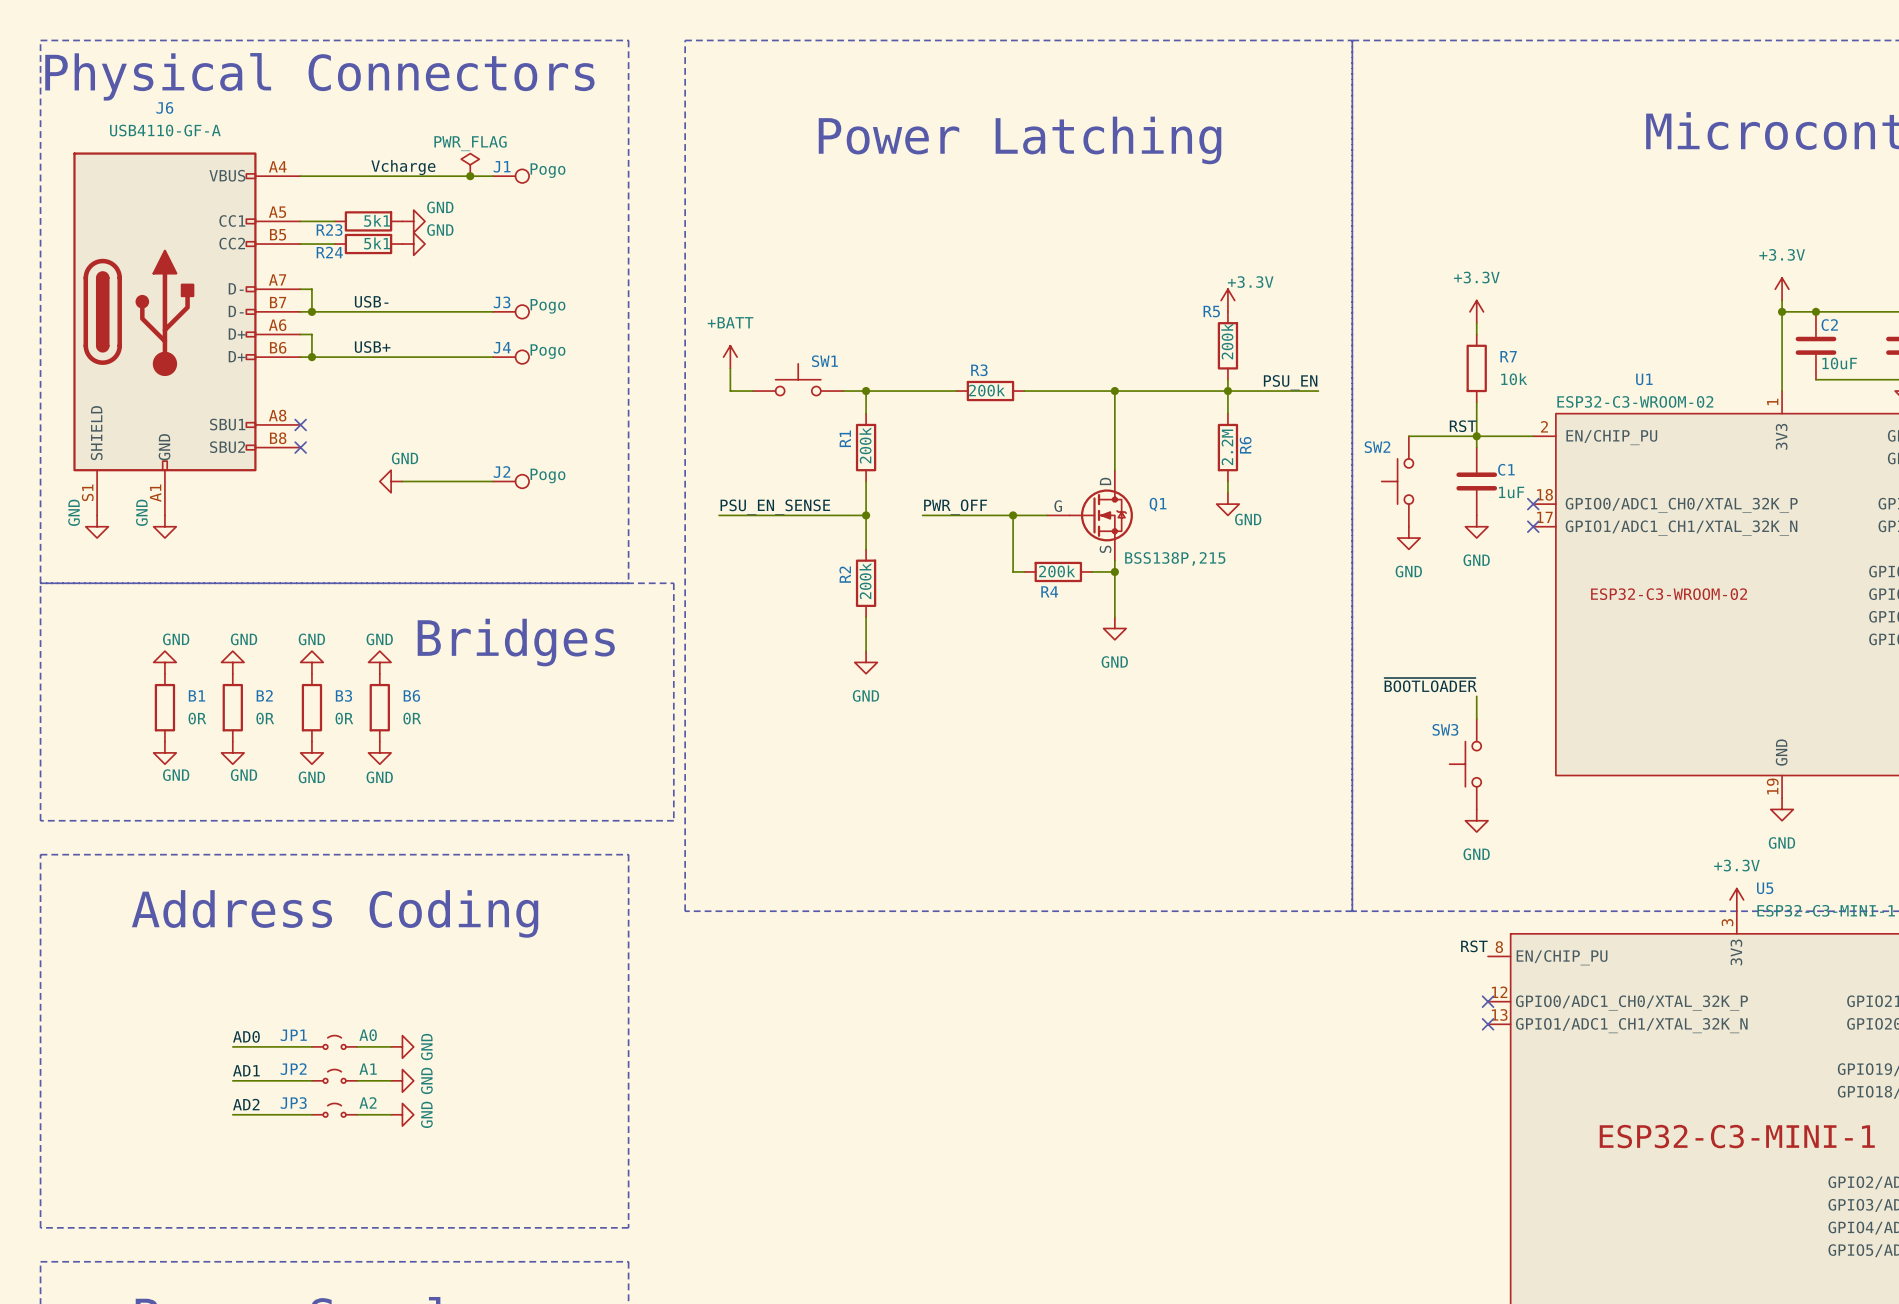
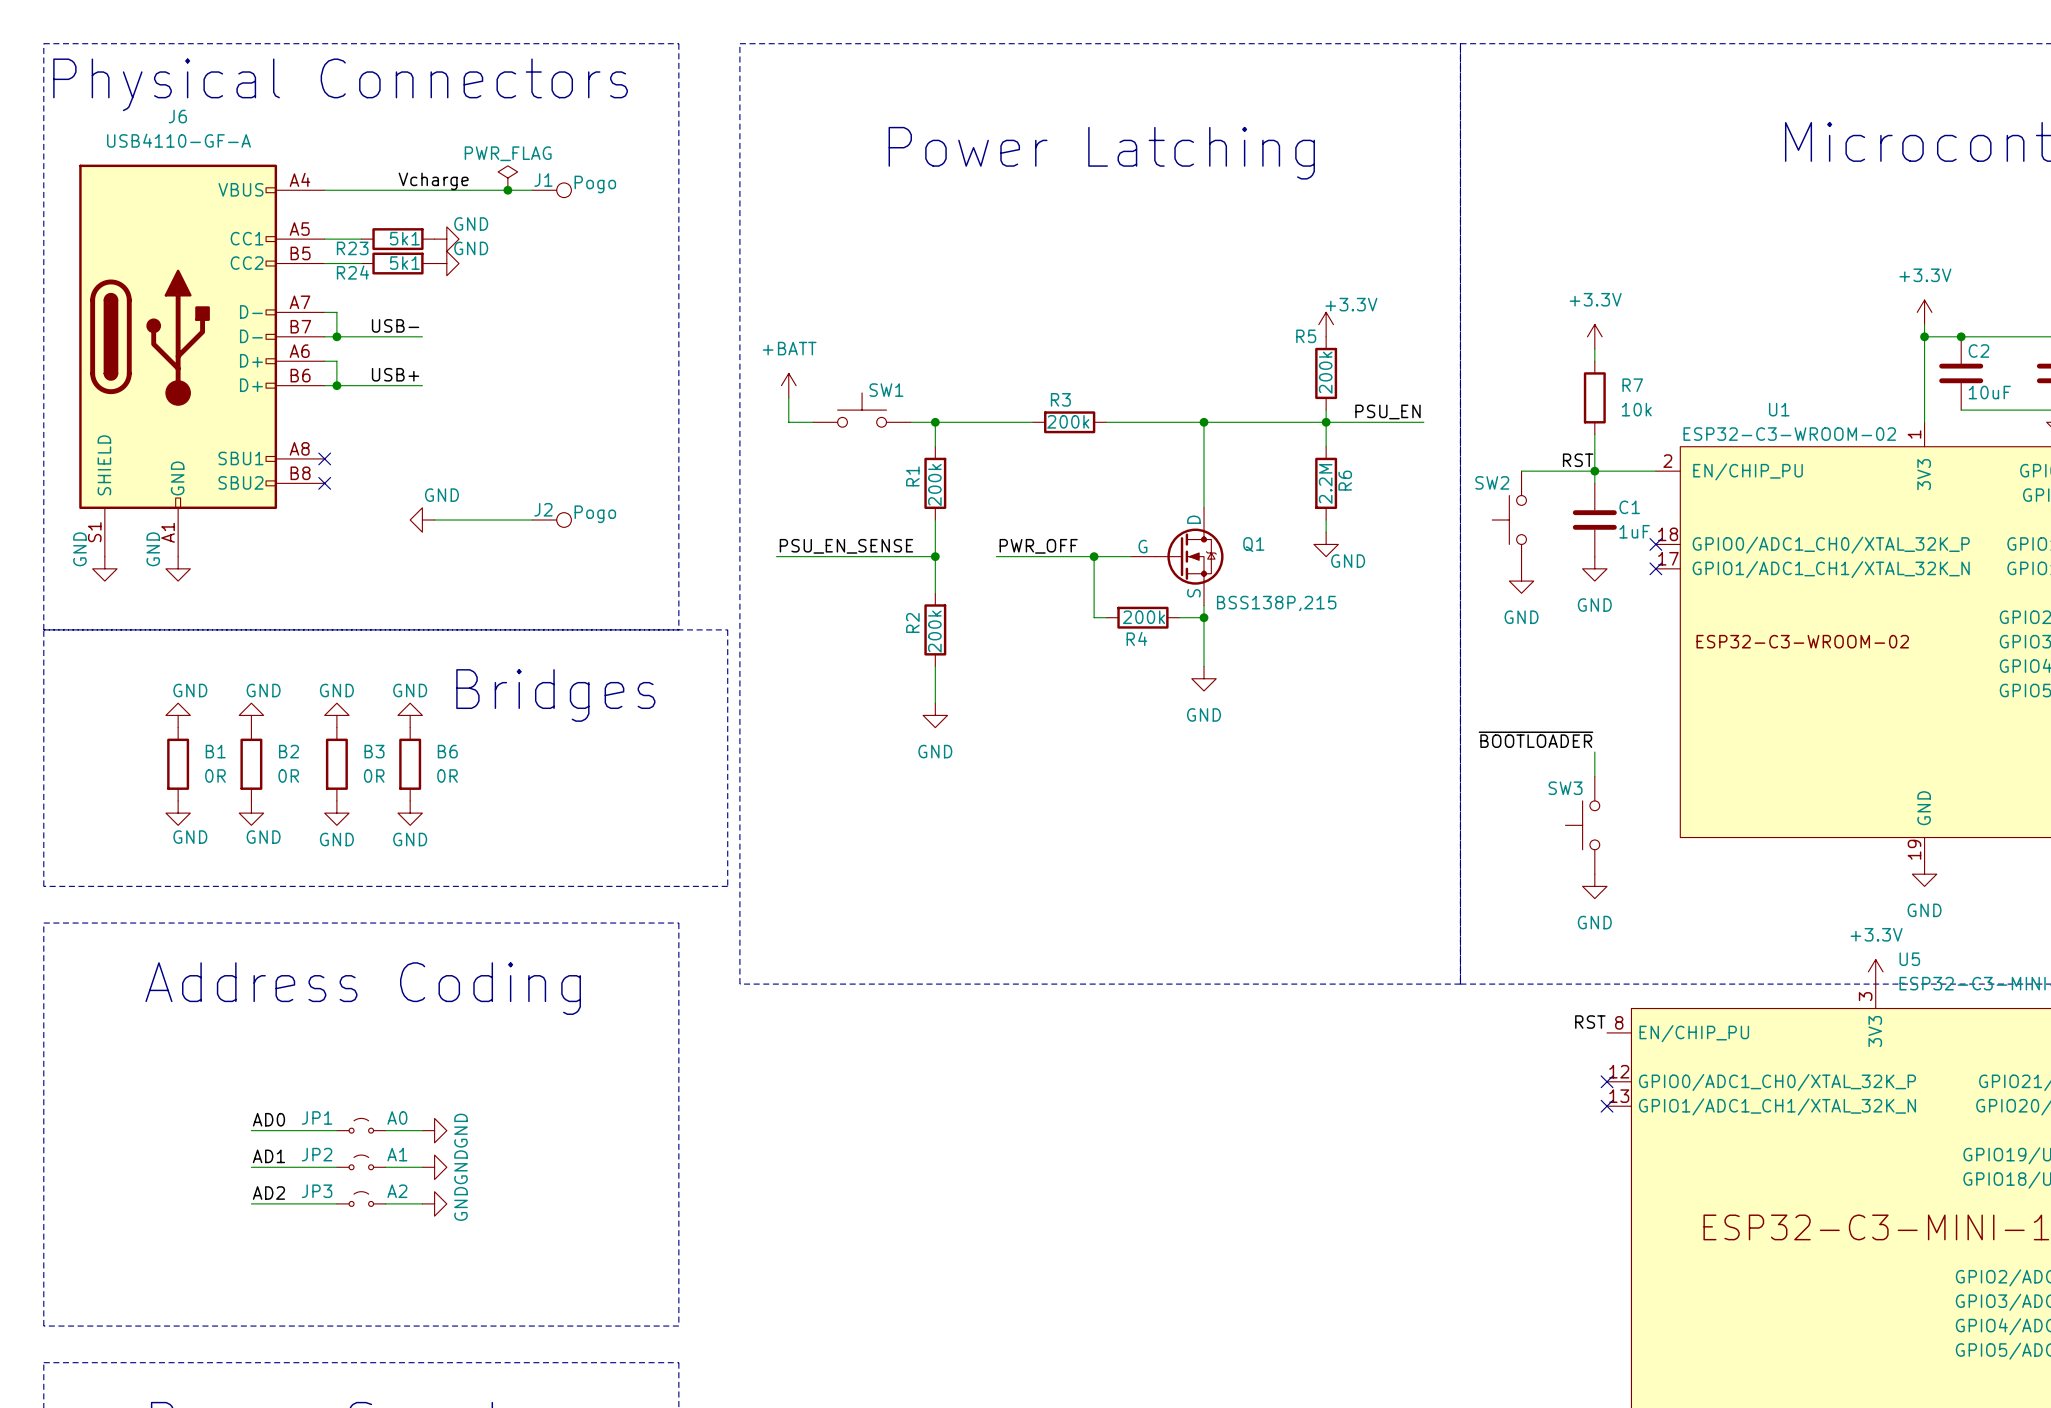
wire: (391, 311) (492, 311) -> none
J3: Pogo (510, 311) -> none
wire: (391, 357) (492, 357) -> none
J4: Pogo (510, 357) -> none

